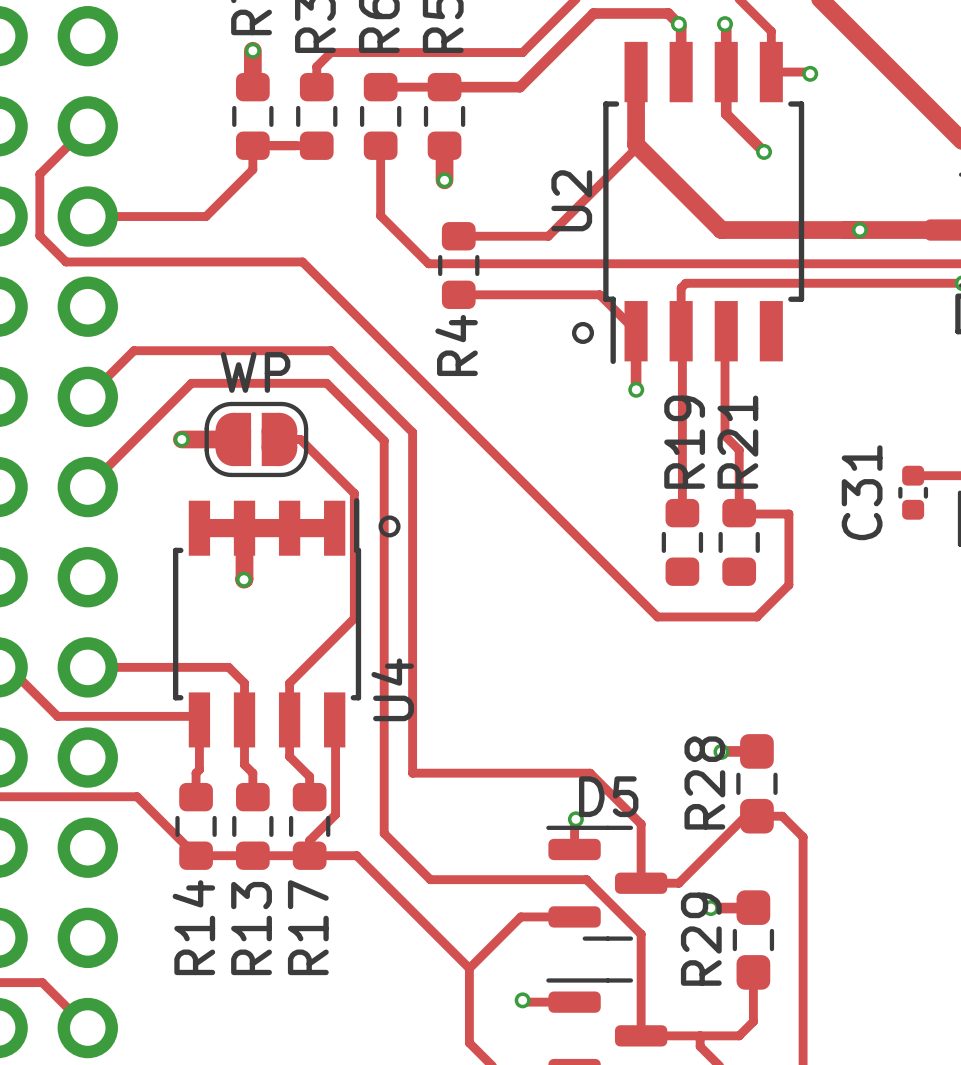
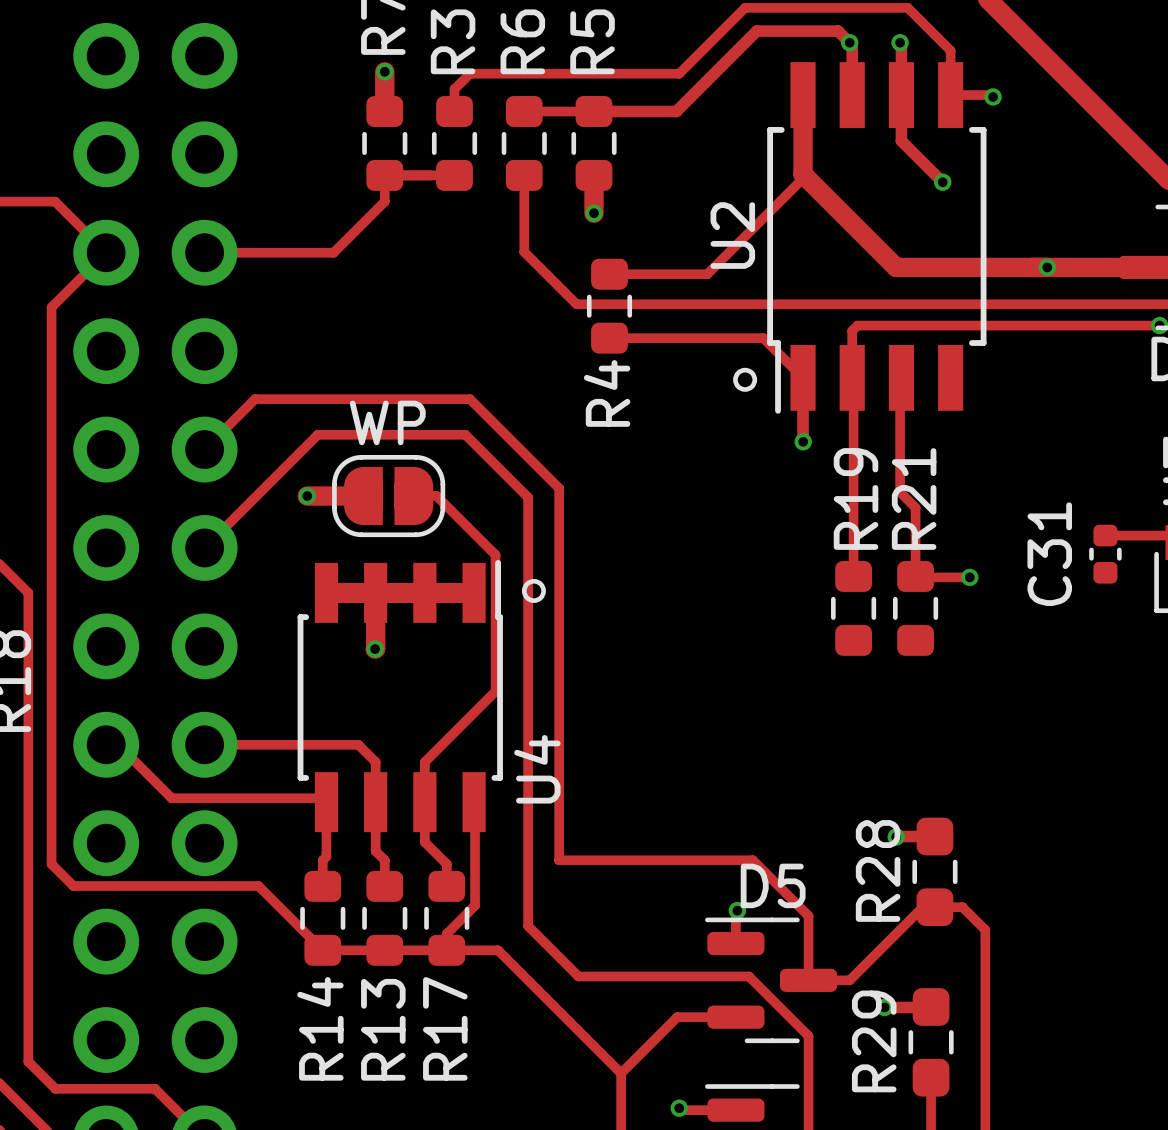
track: (87, 126) (39, 174) (39, 235) (66, 261) (302, 261) (657, 616) (756, 616) (788, 585) (788, 514) -> none
via: none -> (969, 577)

